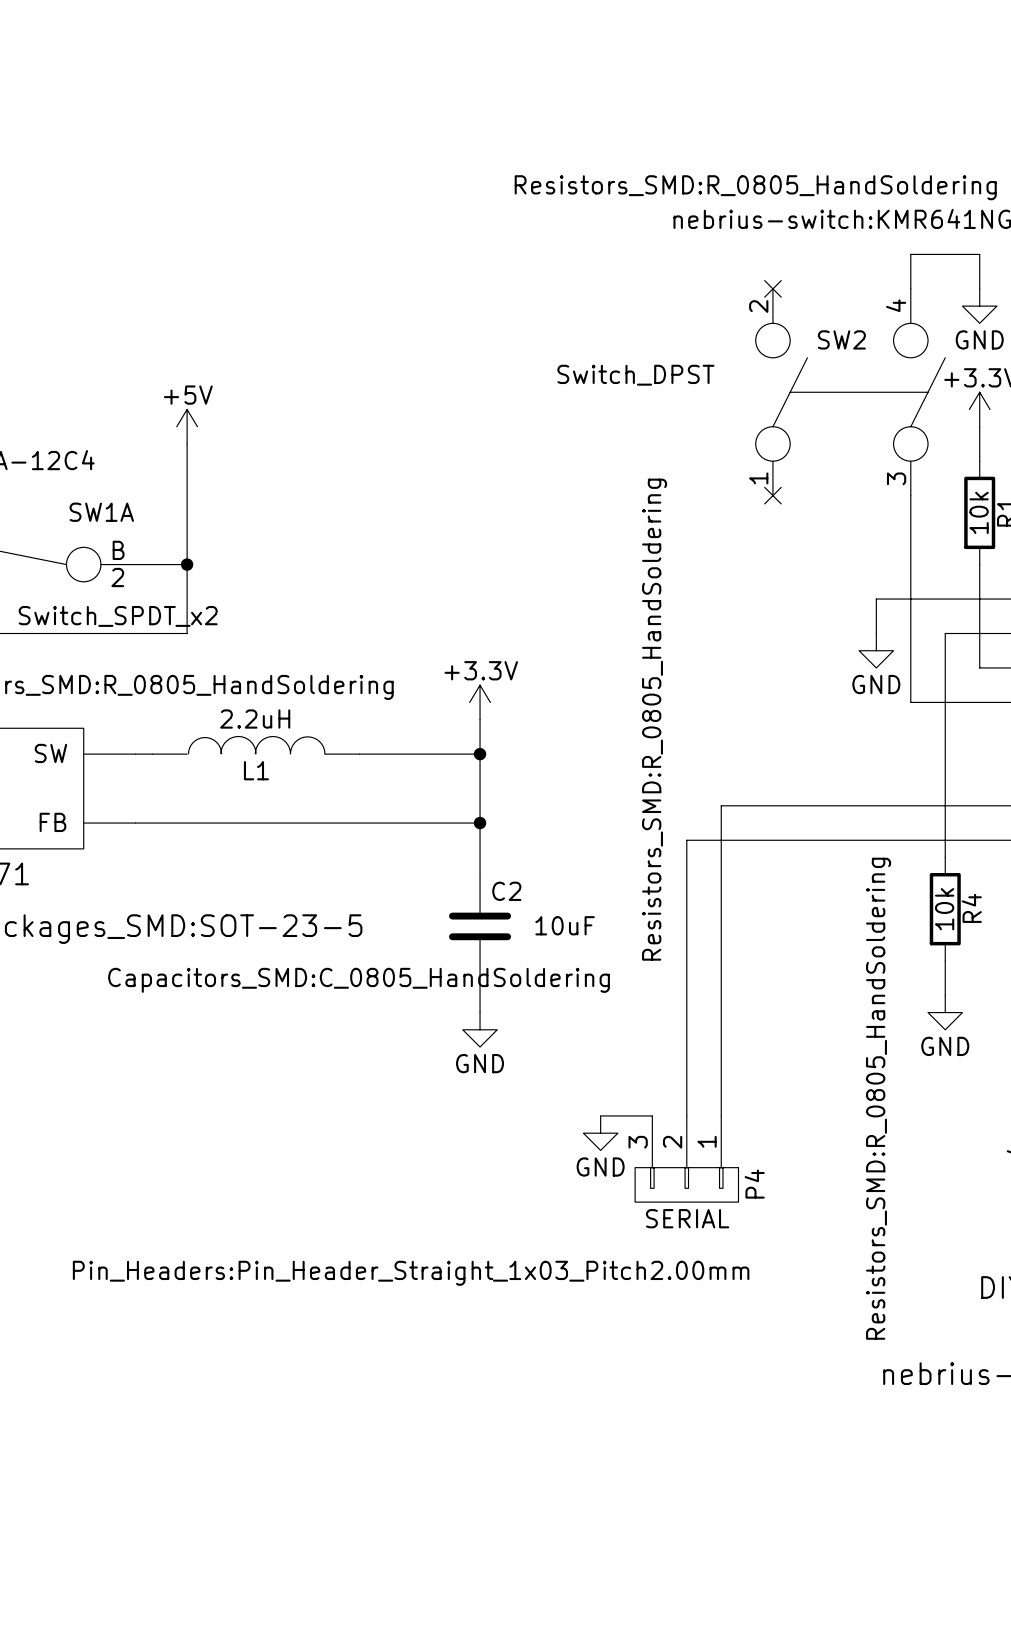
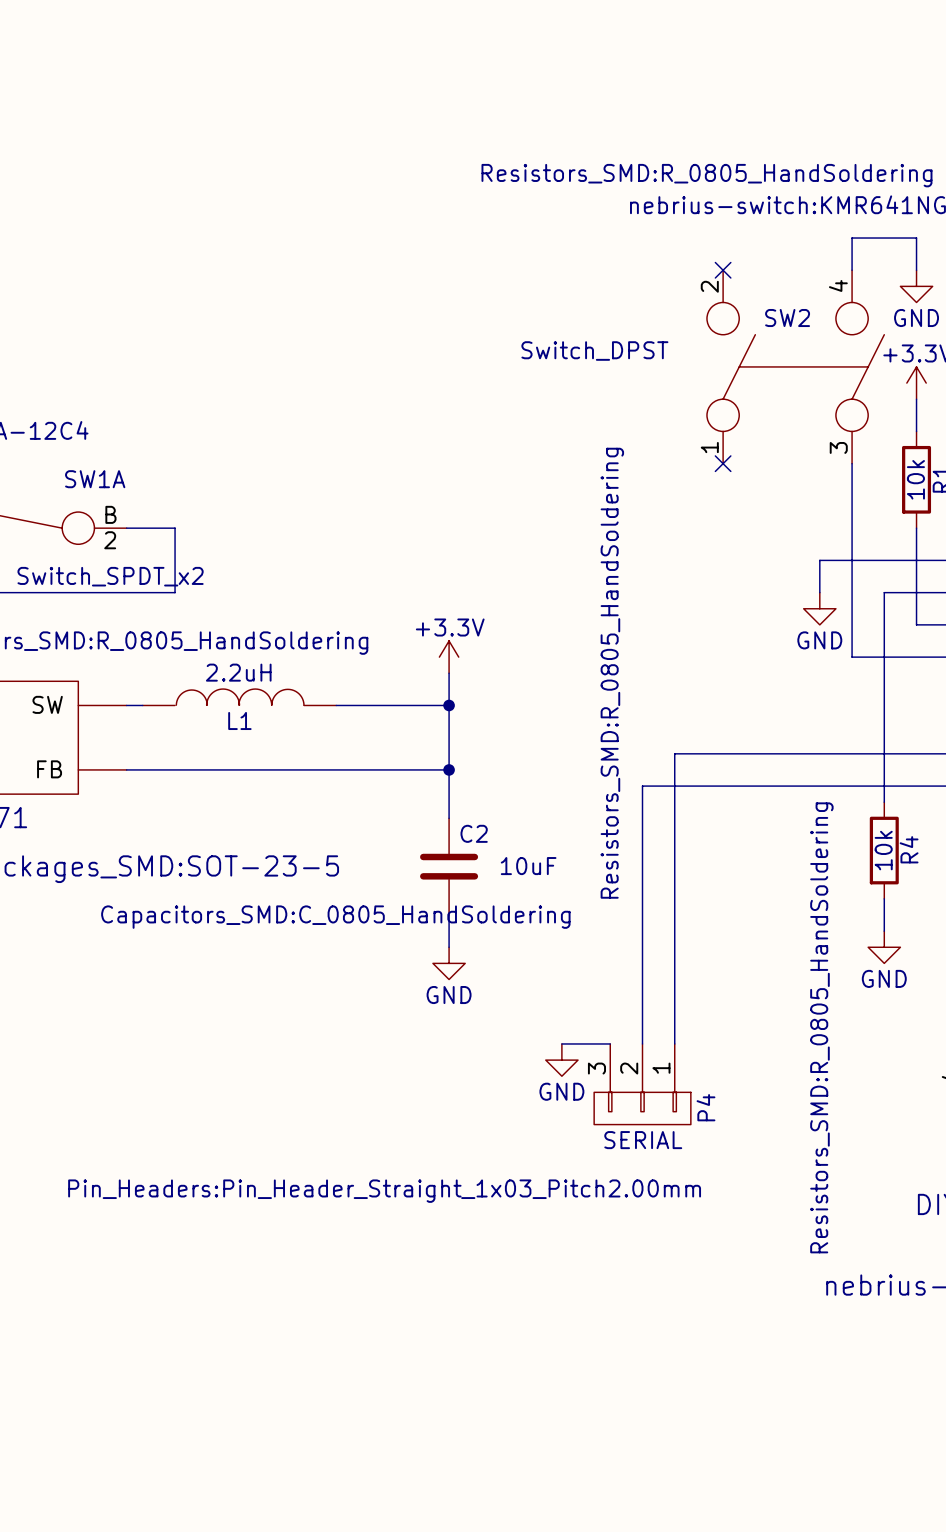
power symbol: +5V (187, 426) -> none
wire: (187, 443) (187, 564) -> none
junction: (187, 564) -> none

